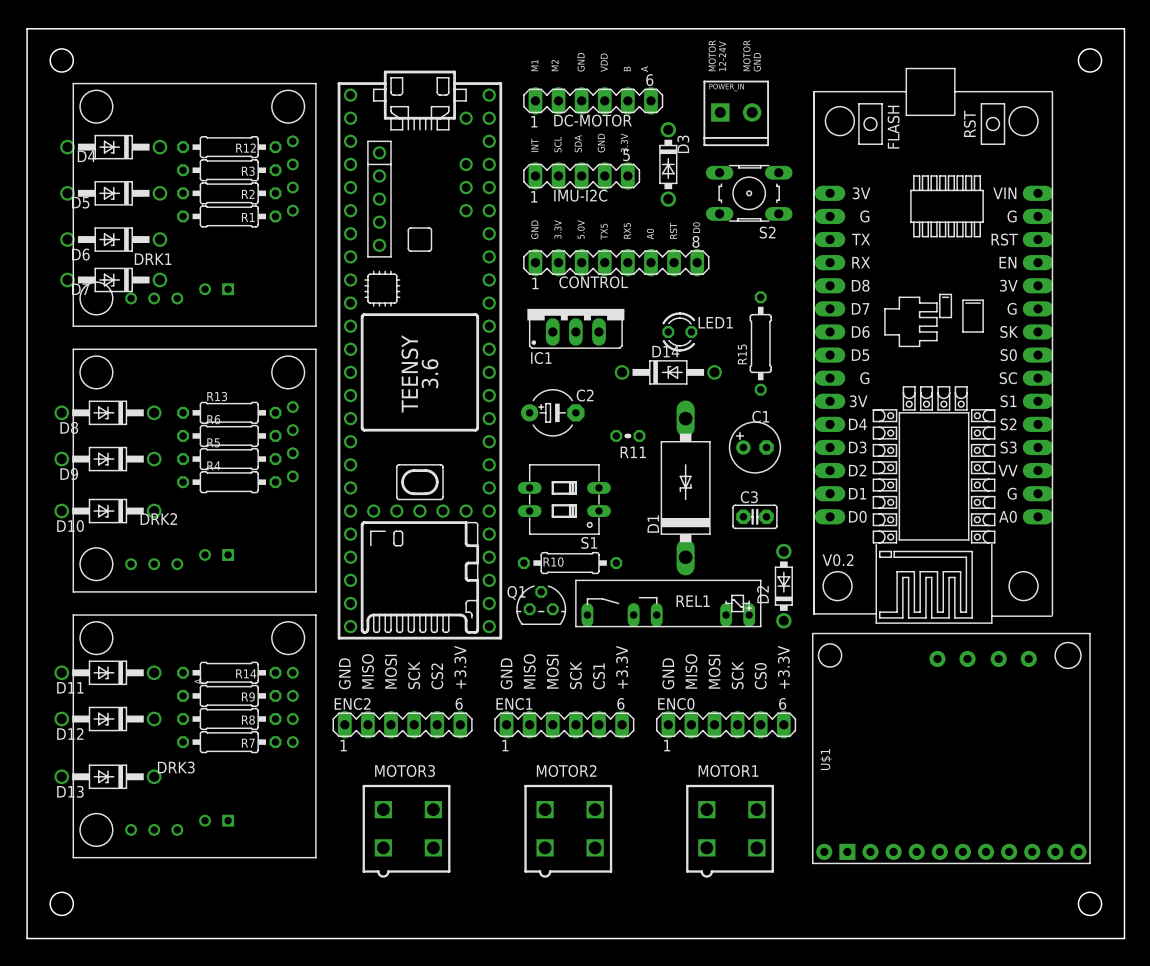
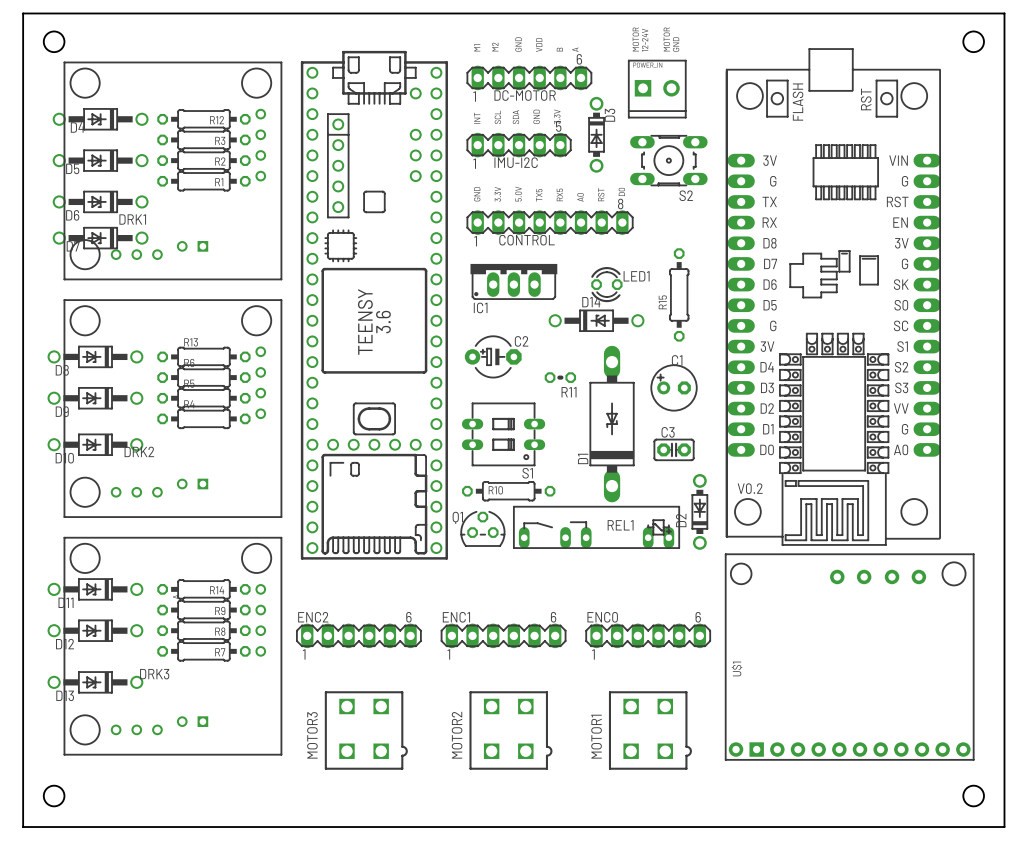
text: +3.3V (460, 667) -> none
text: +3.3V (622, 667) -> none
text: +3.3V (783, 667) -> none
text: MISO (367, 671) -> none
text: MOSI (391, 671) -> none
text: MISO (529, 671) -> none
text: MOSI (552, 671) -> none
text: MISO (691, 671) -> none
text: MOSI (714, 671) -> none
text: GND (344, 673) -> none
text: GND (506, 673) -> none
text: GND (668, 673) -> none
text: SCK (414, 675) -> none
text: SCK (575, 675) -> none
text: SCK (737, 675) -> none
text: CS2 (437, 676) -> none
text: CS1 (598, 676) -> none
text: CS0 (760, 676) -> none
MOTOR3 rotation: 0° (406, 831) -> 90° counterclockwise (366, 730)
MOTOR2 rotation: 0° (568, 831) -> 90° counterclockwise (510, 730)
MOTOR1 rotation: 0° (730, 831) -> 90° counterclockwise (650, 730)

